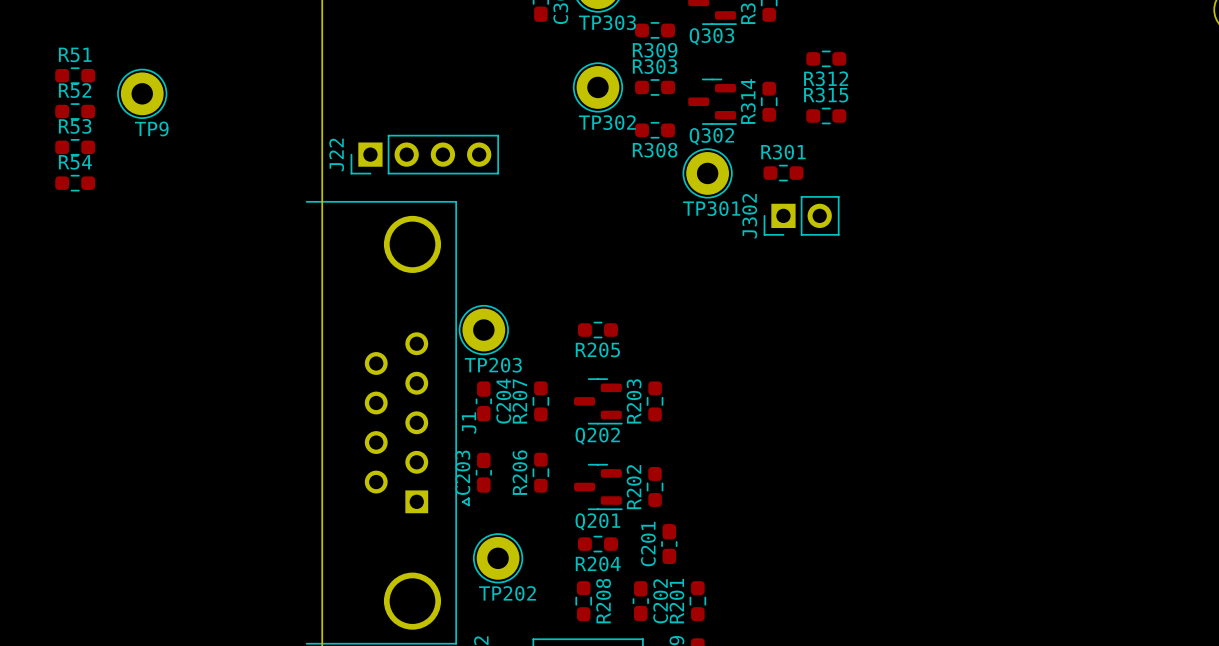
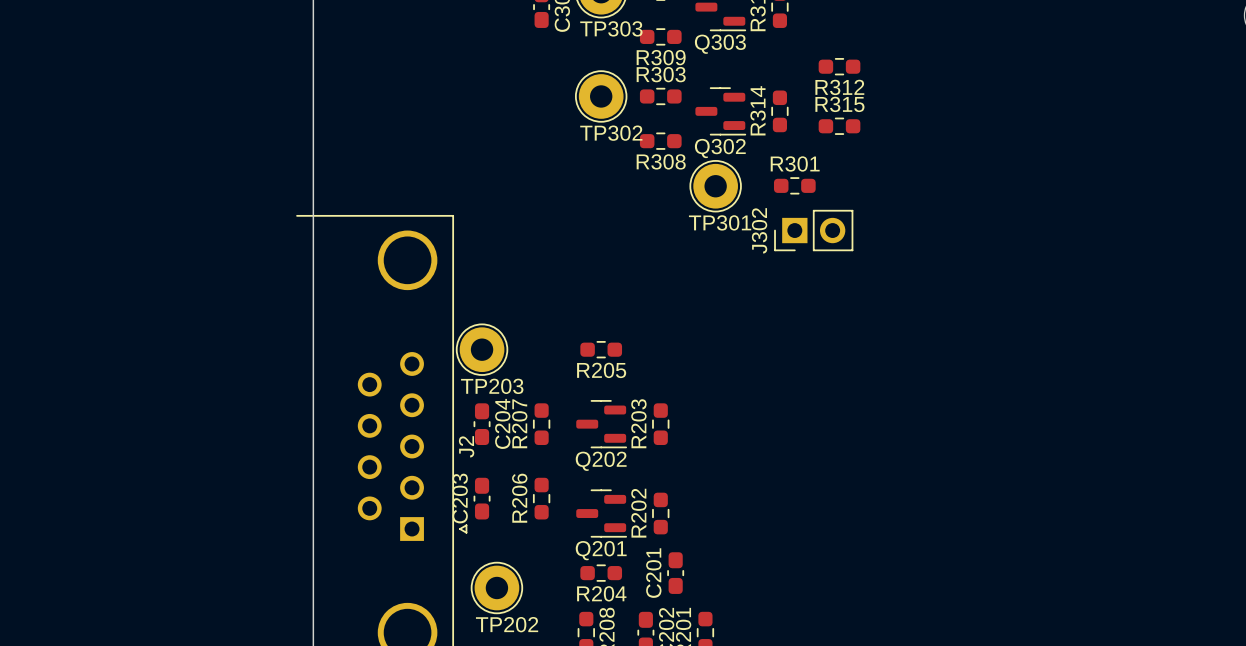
R51: (75, 75) -> none
TP9: (142, 93) -> none
R52: (75, 111) -> none
R53: (75, 147) -> none
J22: (424, 154) -> none
R54: (75, 183) -> none
J1 name: J1 (469, 422) -> J2 (466, 446)

